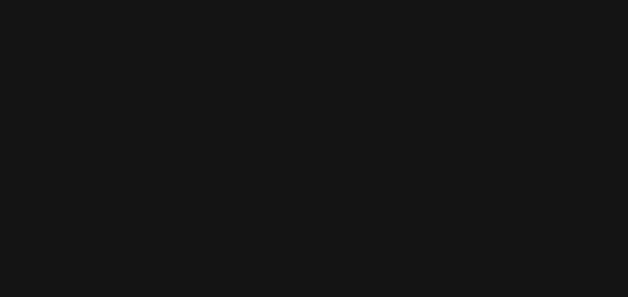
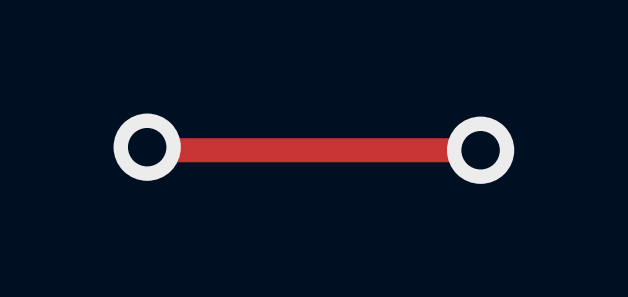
track: none -> (147, 147) (150, 150) (480, 150)
via: none -> (147, 147)
via: none -> (480, 150)

